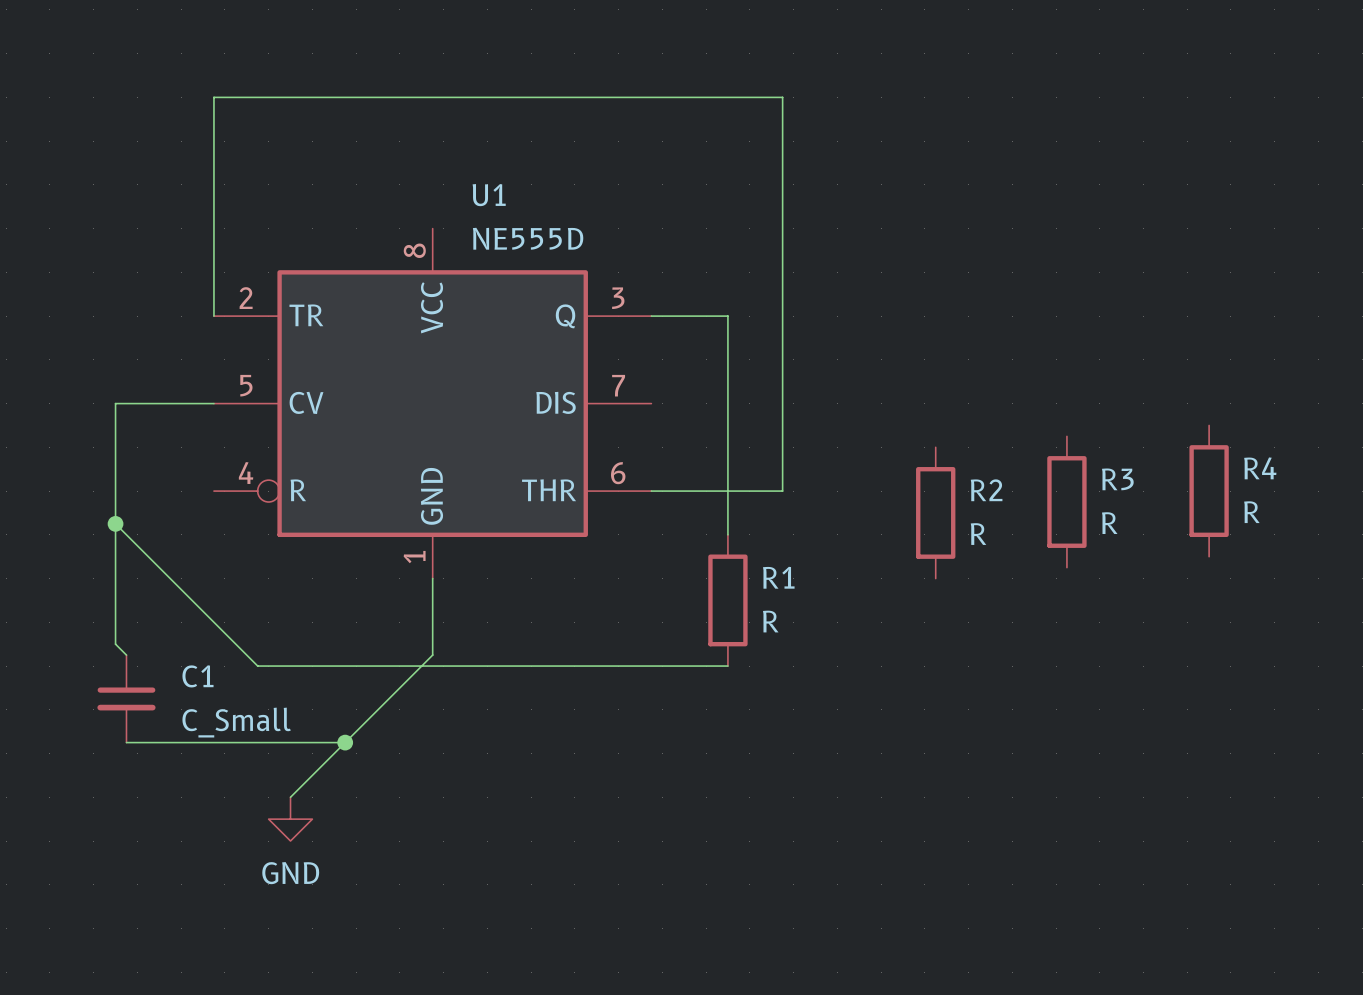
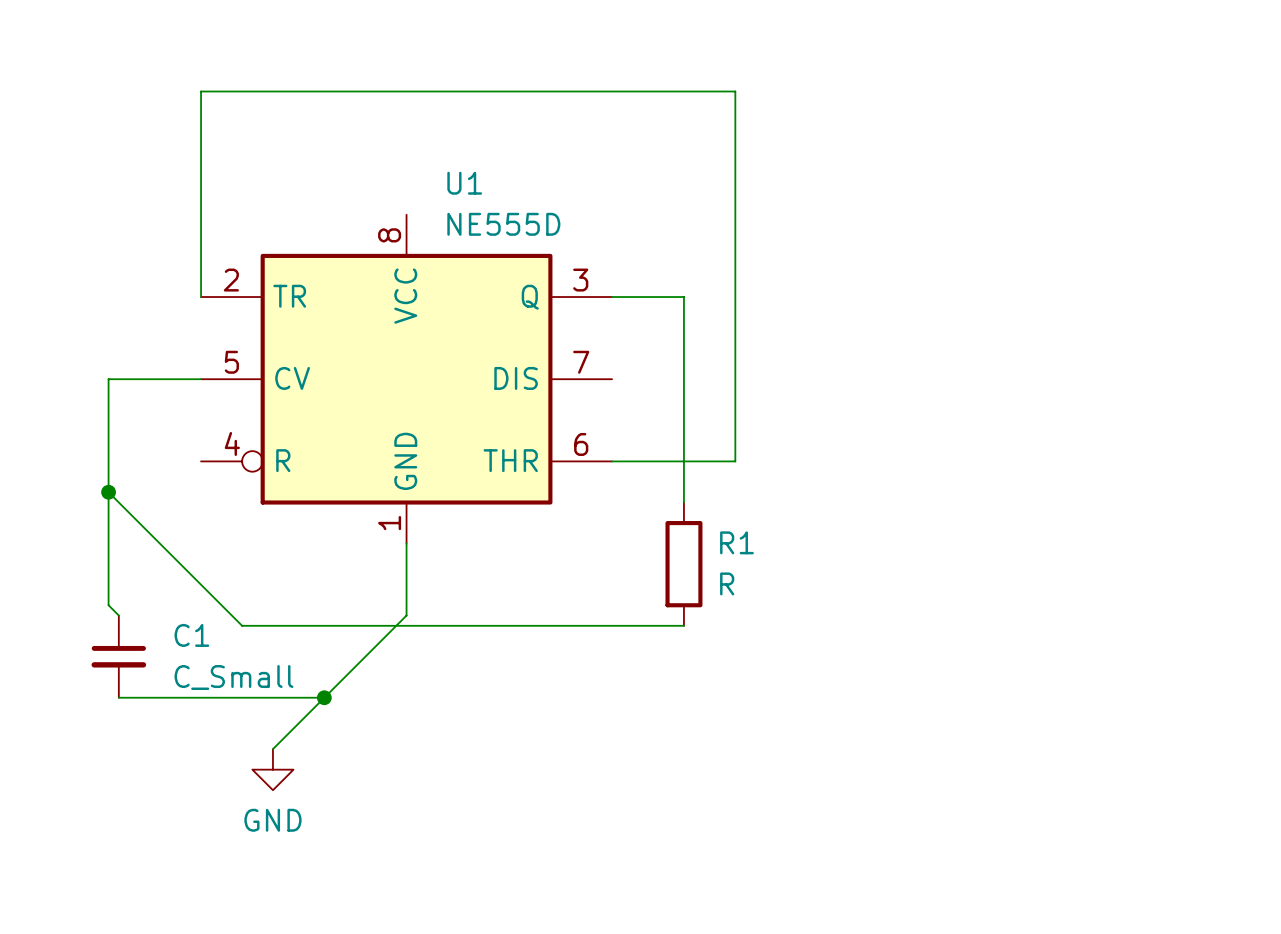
R4: R (1209, 491) -> none
R3: R (1066, 502) -> none
R2: R (935, 512) -> none

